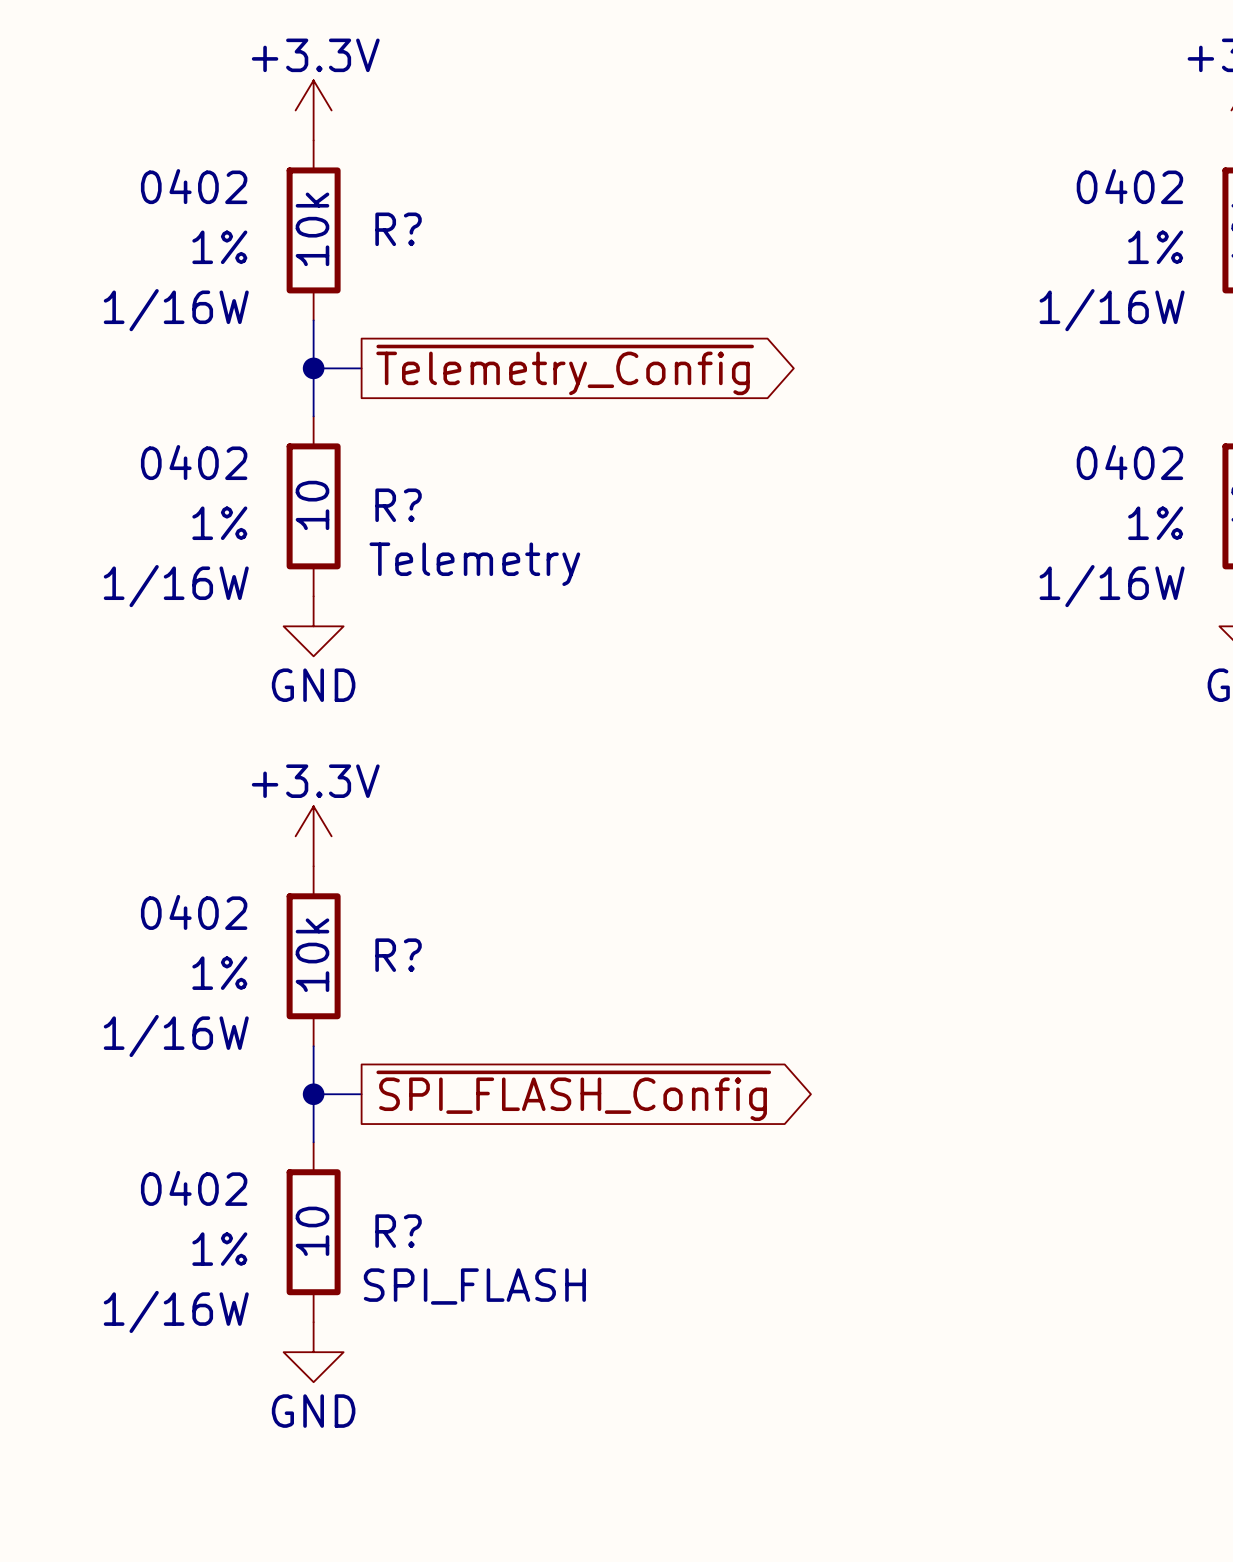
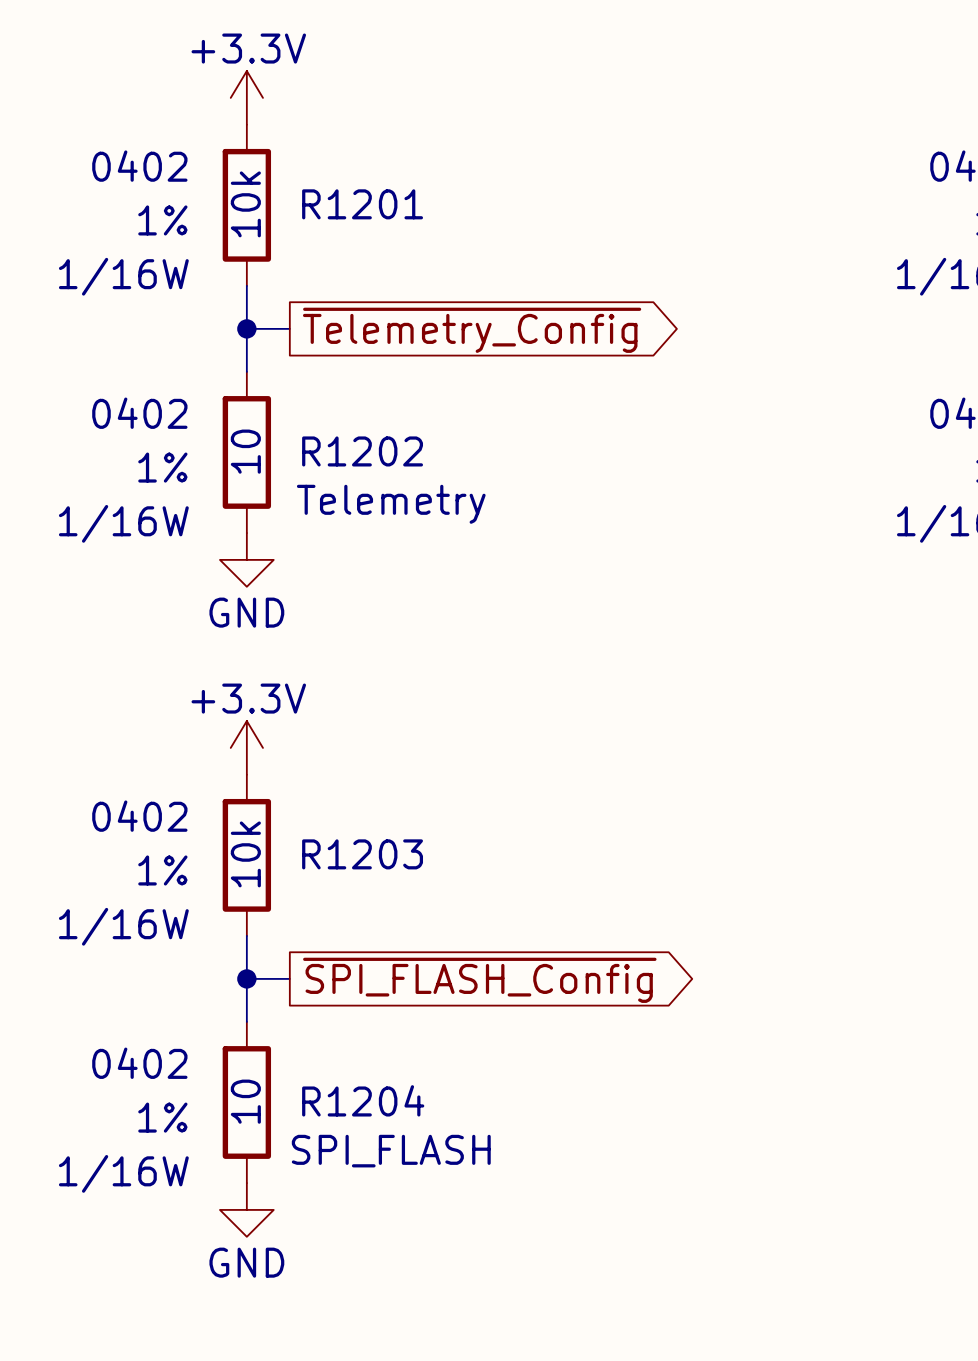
R? name: R? (398, 229) -> R1201 (362, 204)
R? name: R? (398, 505) -> R1202 (362, 451)
R? name: R? (398, 955) -> R1203 (362, 854)
R? name: R? (398, 1231) -> R1204 (363, 1100)

